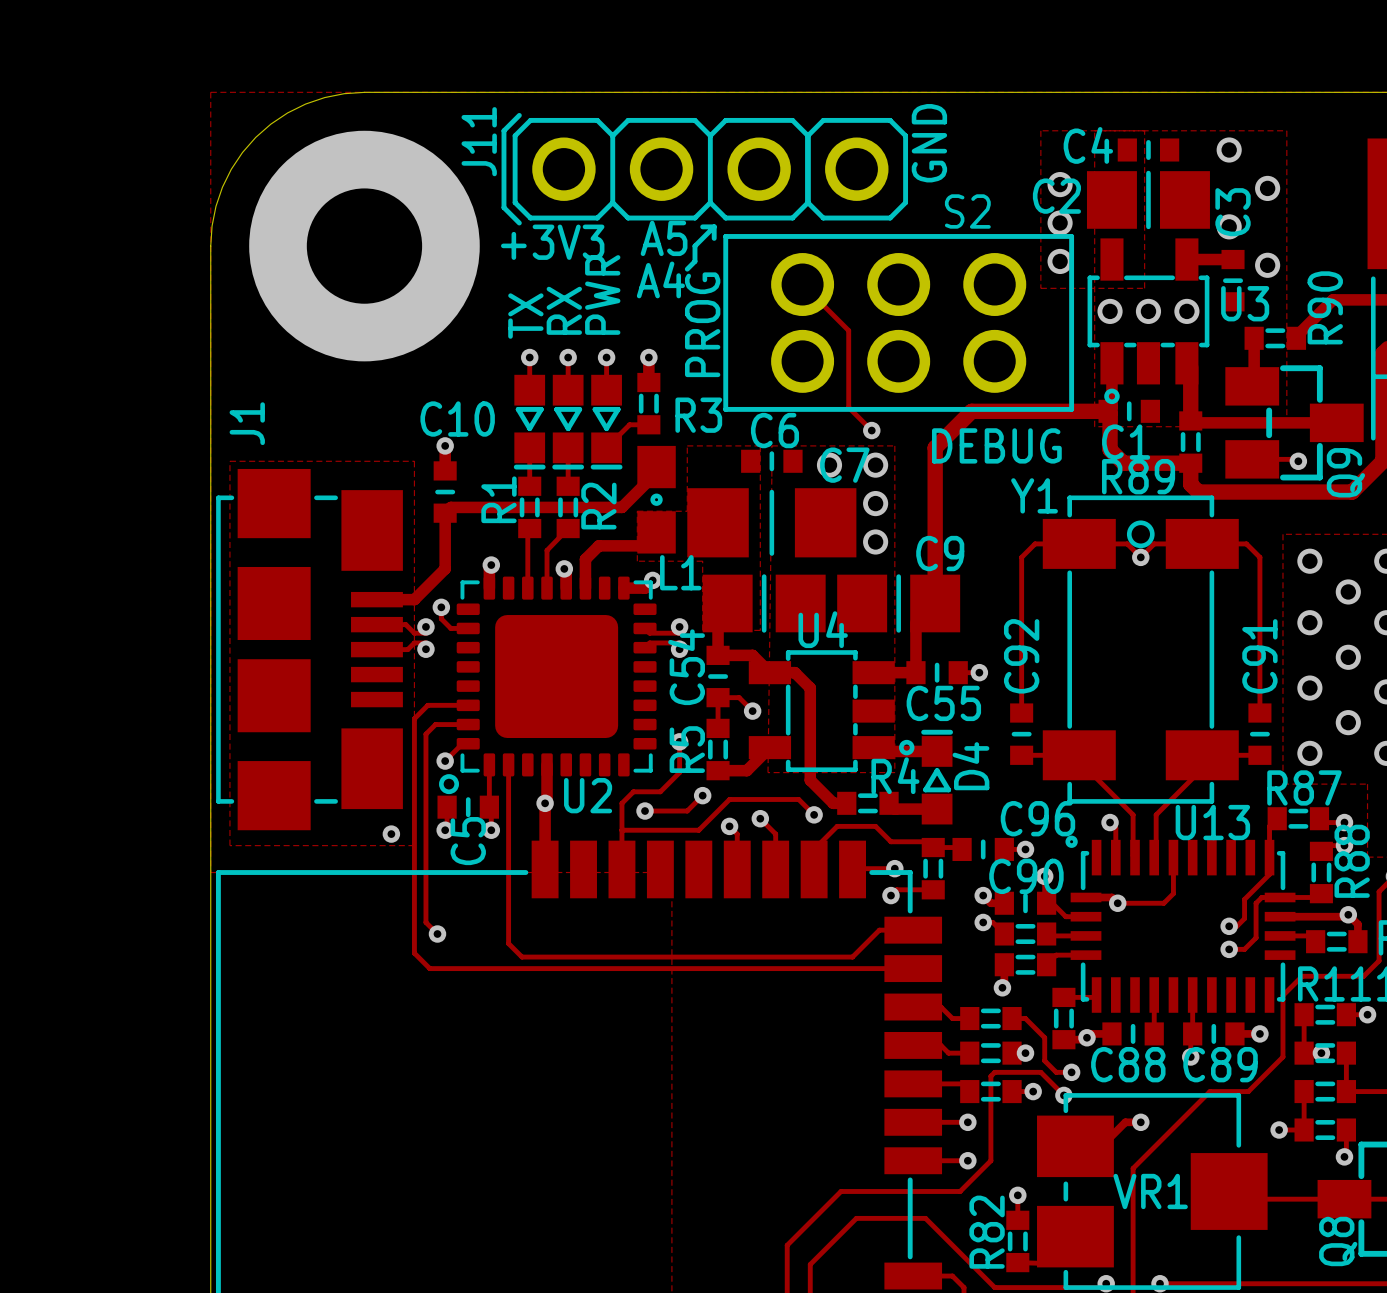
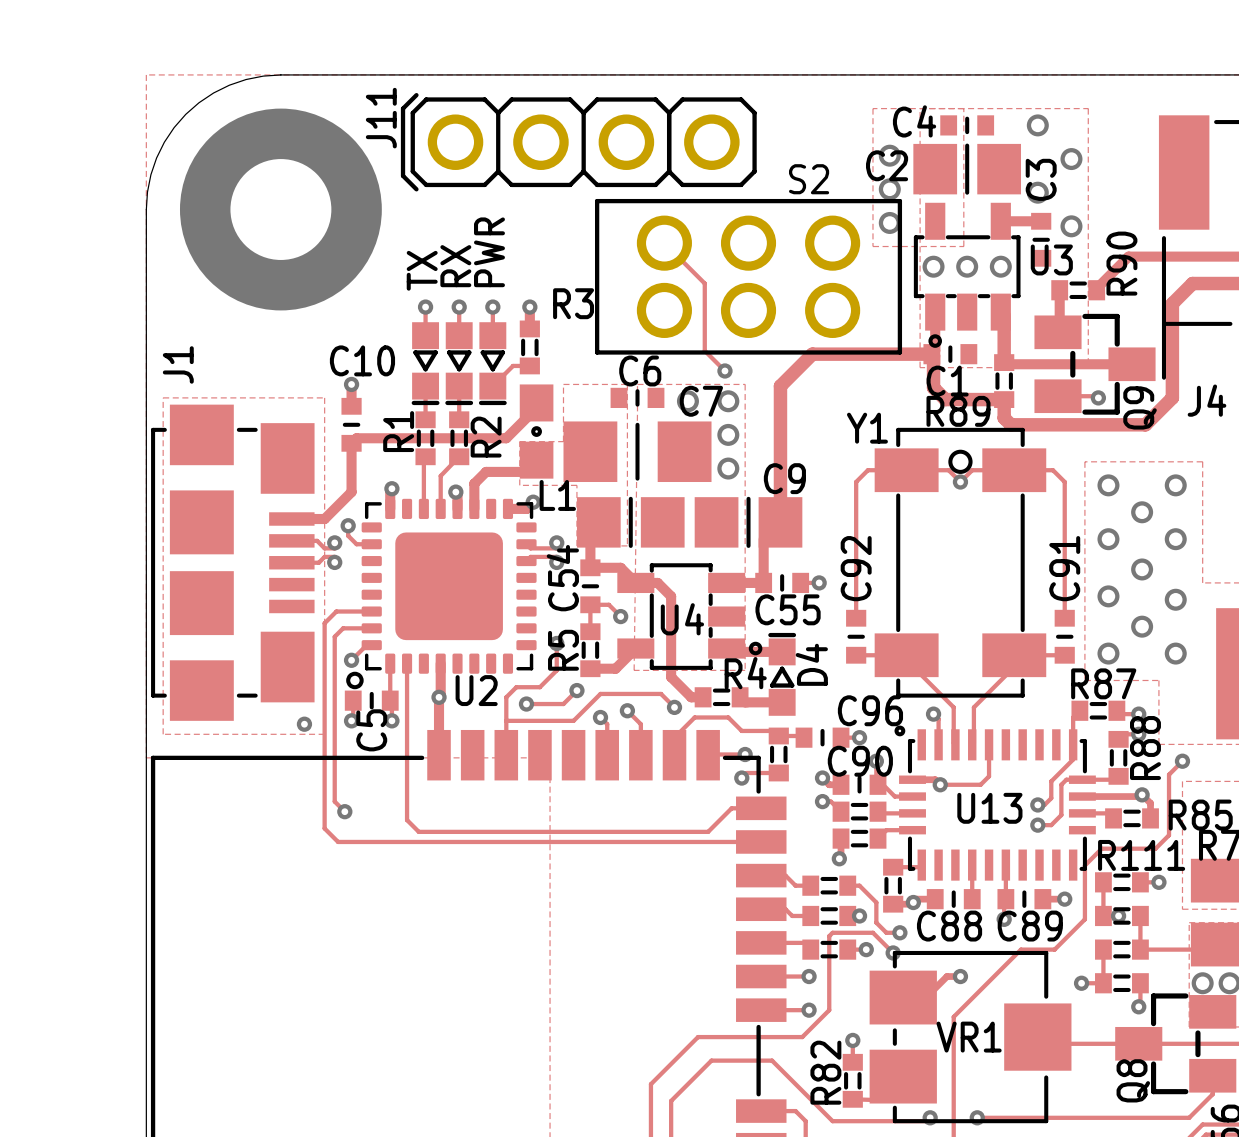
text: GND (929, 143) -> none
line: (702, 226) (714, 226) -> none
line: (714, 226) (694, 246) (694, 261) (687, 269) -> none
line: (714, 226) (714, 238) -> none
text: A5 (664, 238) -> none
text: +3V3 (552, 242) -> none
text: A4 (660, 279) -> none
text: PROG (702, 324) -> none
R3 name position: R3 (698, 415) -> R3 (573, 303)
text: DEBUG (996, 445) -> none
U4 name position: U4 (823, 629) -> U4 (682, 619)
U13 name position: U13 (1212, 822) -> U13 (989, 808)

